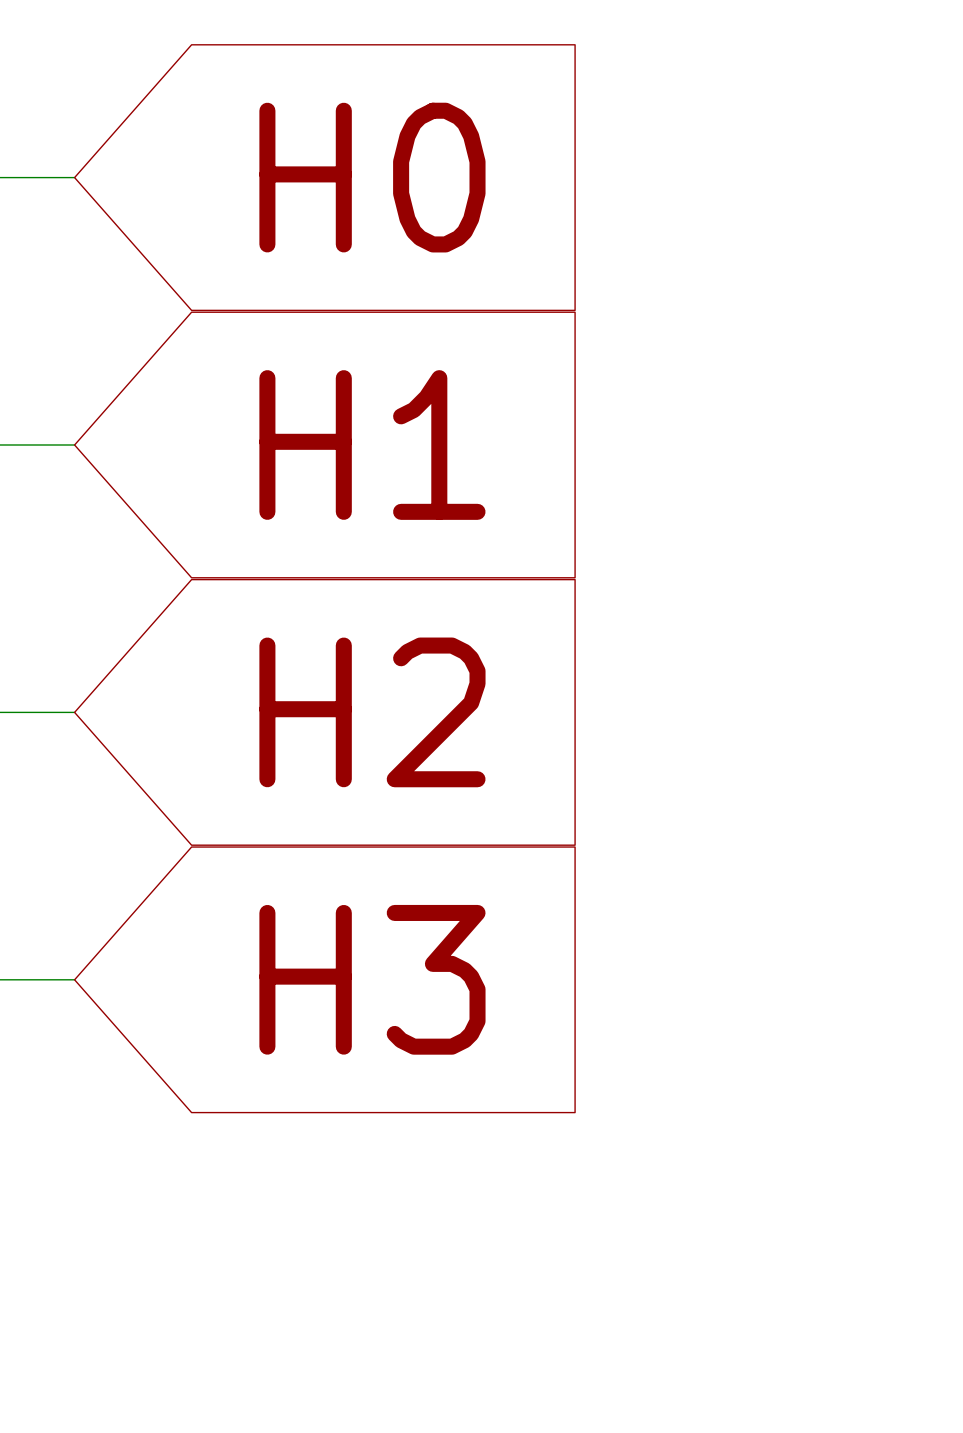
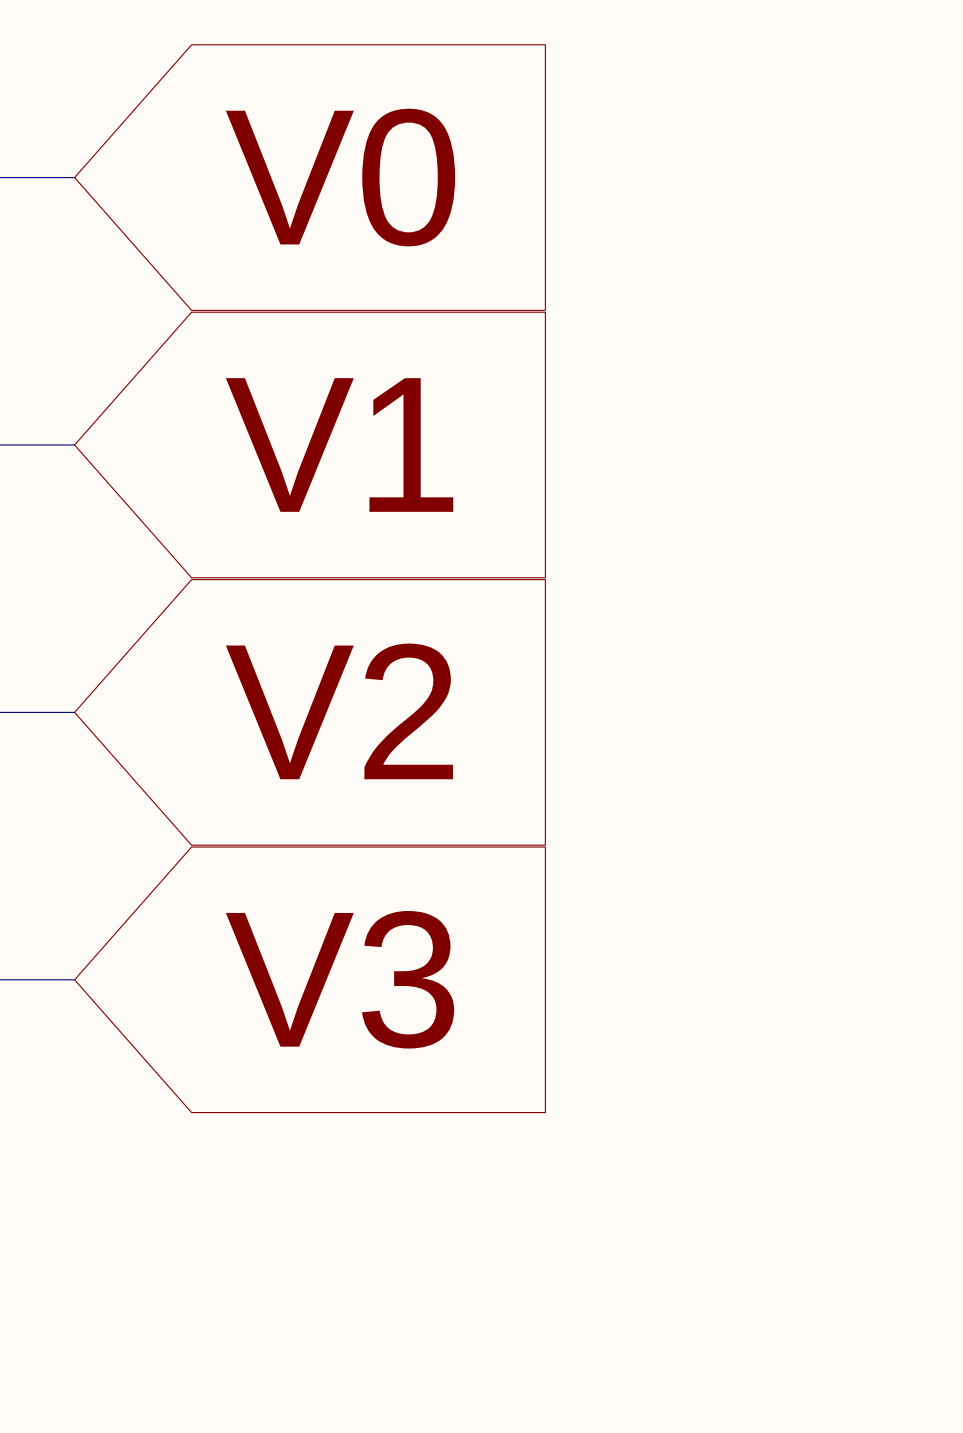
global label: H0 (372, 177) -> V0 (340, 177)
global label: H1 (372, 444) -> V1 (339, 444)
global label: H2 (372, 712) -> V2 (339, 711)
global label: H3 (372, 979) -> V3 (340, 979)

